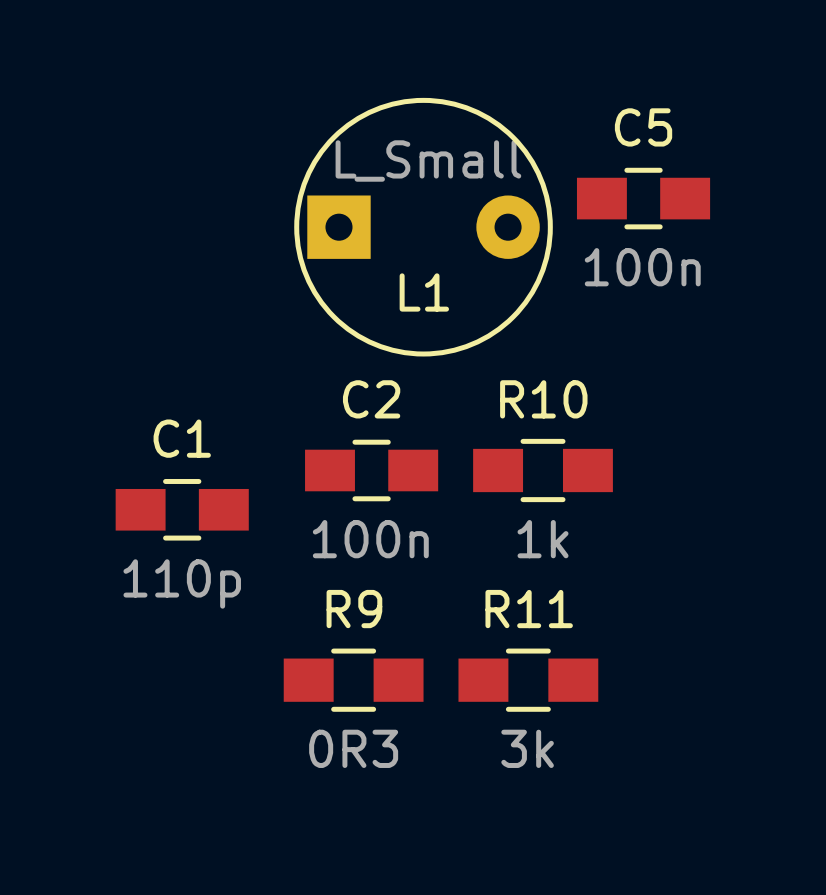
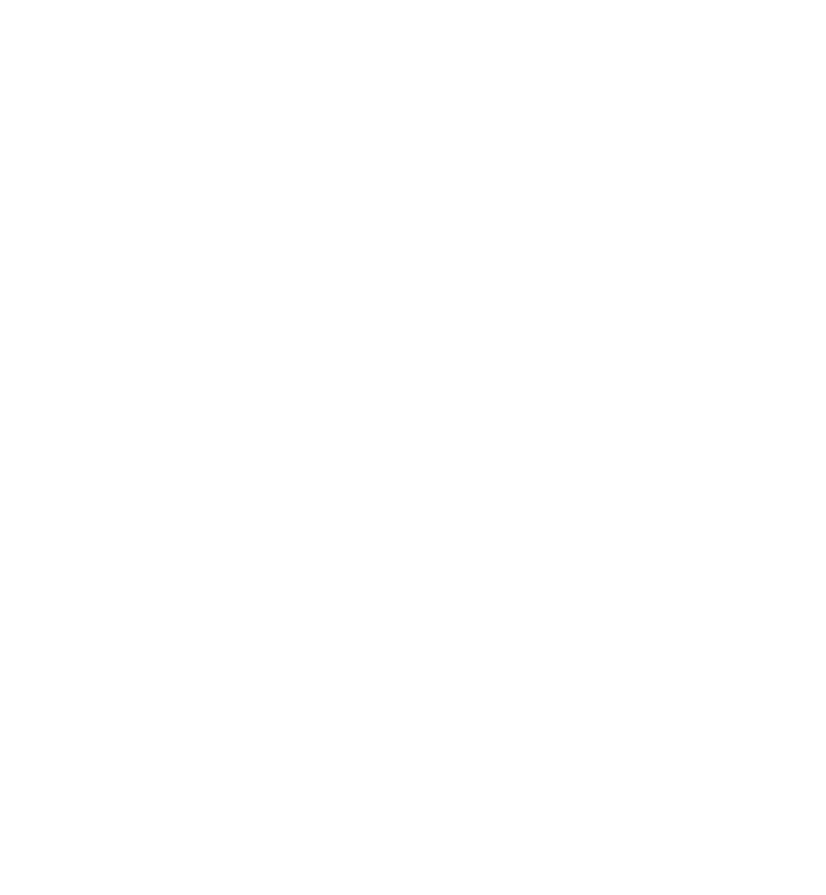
C5: 100n (643, 198) -> none
L1: L_Small (423, 227) -> none
C2: 100n (371, 470) -> none
R10: 1k (543, 470) -> none
C1: 110p (182, 509) -> none
R9: 0R3 (353, 680) -> none
R11: 3k (528, 680) -> none

